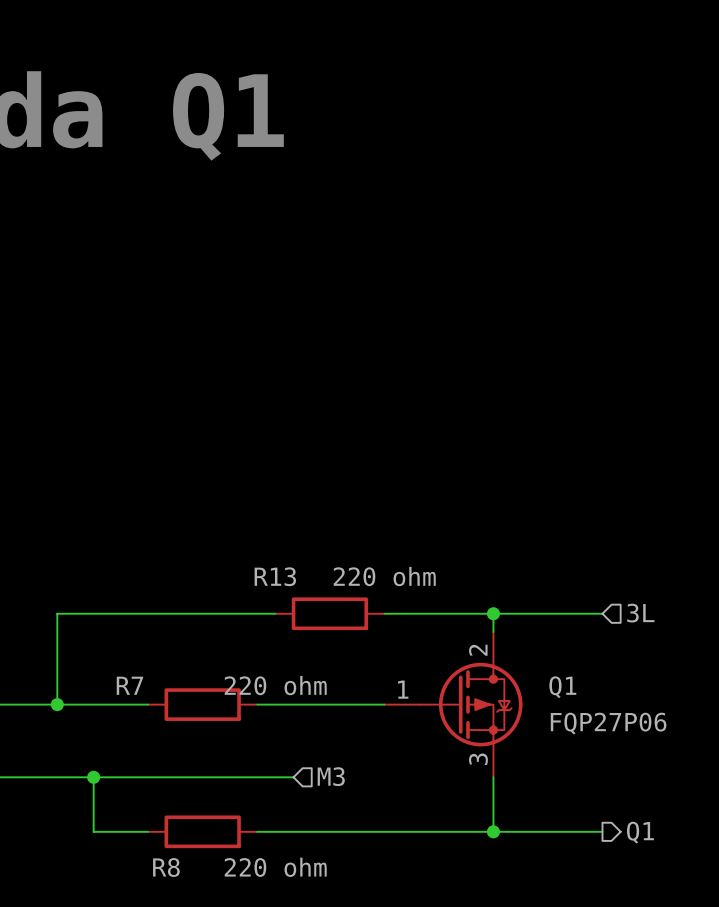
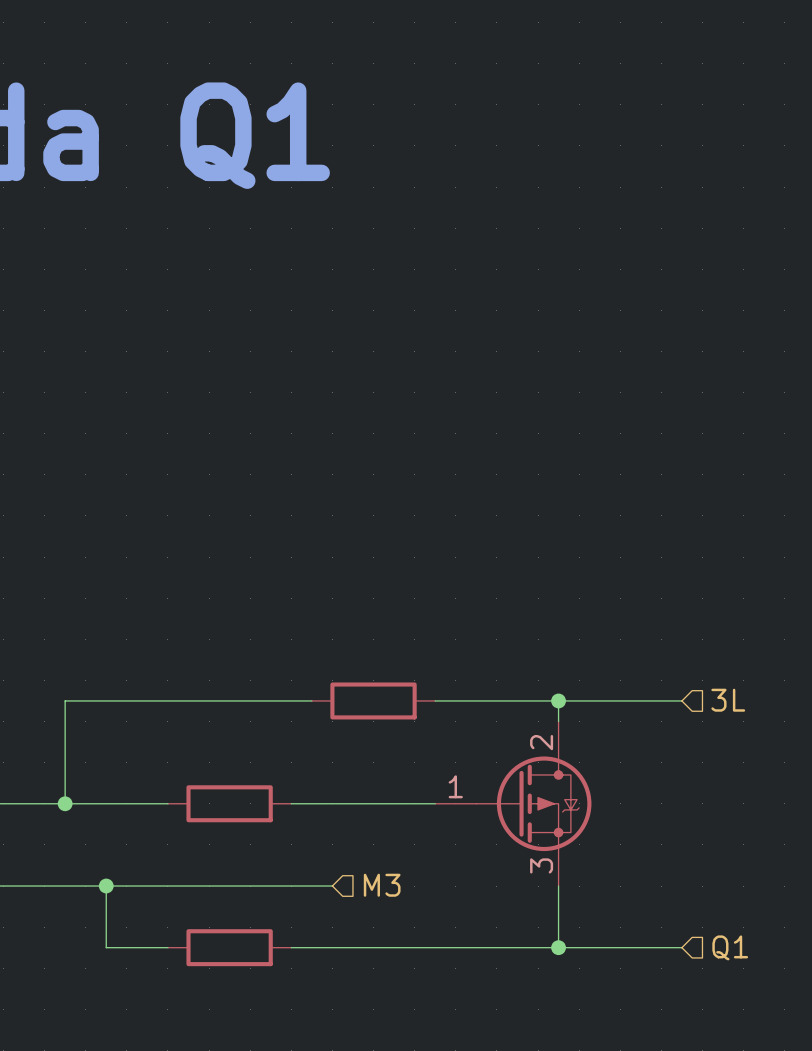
R13 name: R13 (275, 576) -> none
R13 value: 220 ohm (384, 576) -> none
R7 name: R7 (129, 685) -> none
R7 value: 220 ohm (275, 685) -> none
Q1 name: Q1 (562, 687) -> none
Q1 value: FQP27P06 (608, 723) -> none
hierarchical label shape: output (640, 832) -> input (730, 947)
R8 name: R8 (166, 867) -> none
R8 value: 220 ohm (275, 867) -> none

